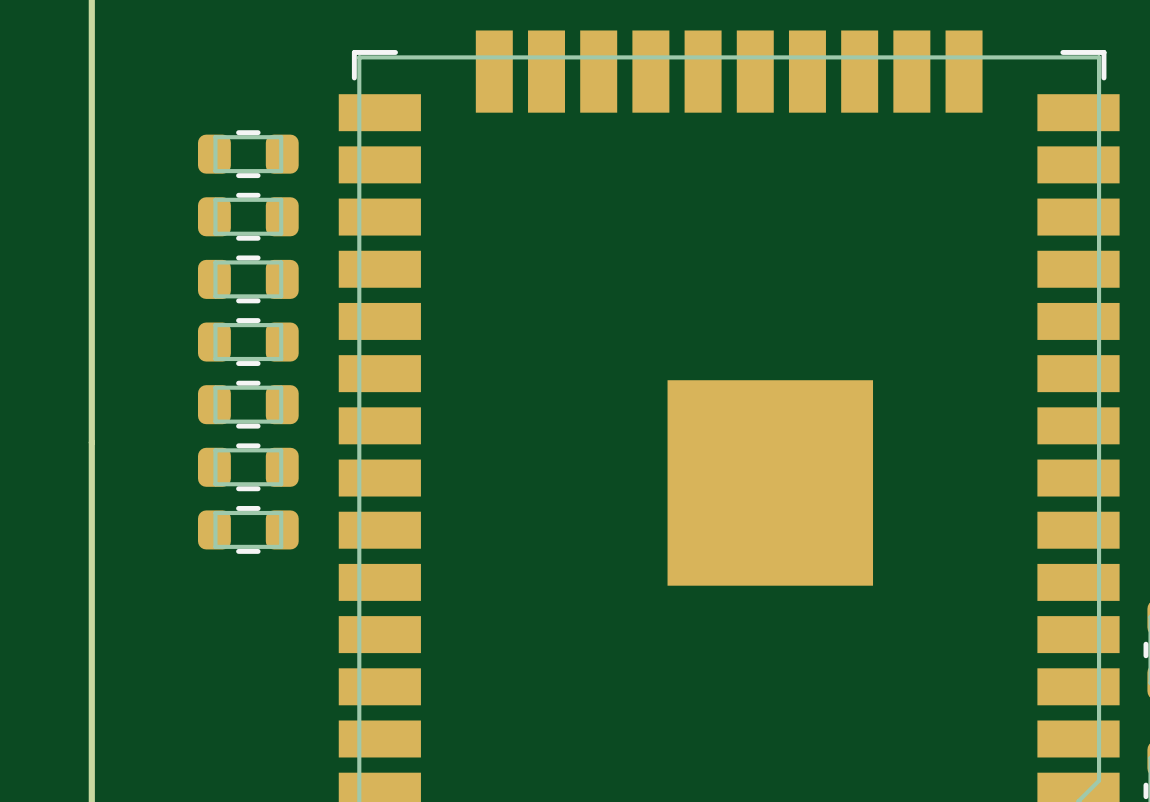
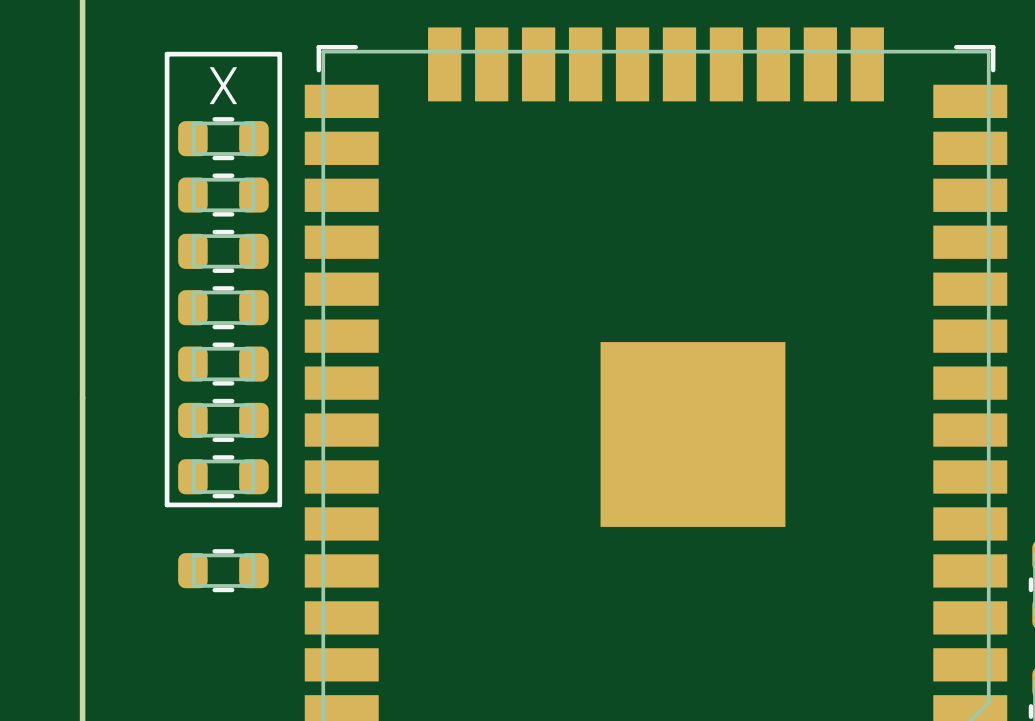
line: none -> (279, 54) (279, 504) (167, 504) (167, 54) (279, 54)
text: none -> X (223, 85)
part: none -> (223, 570)

